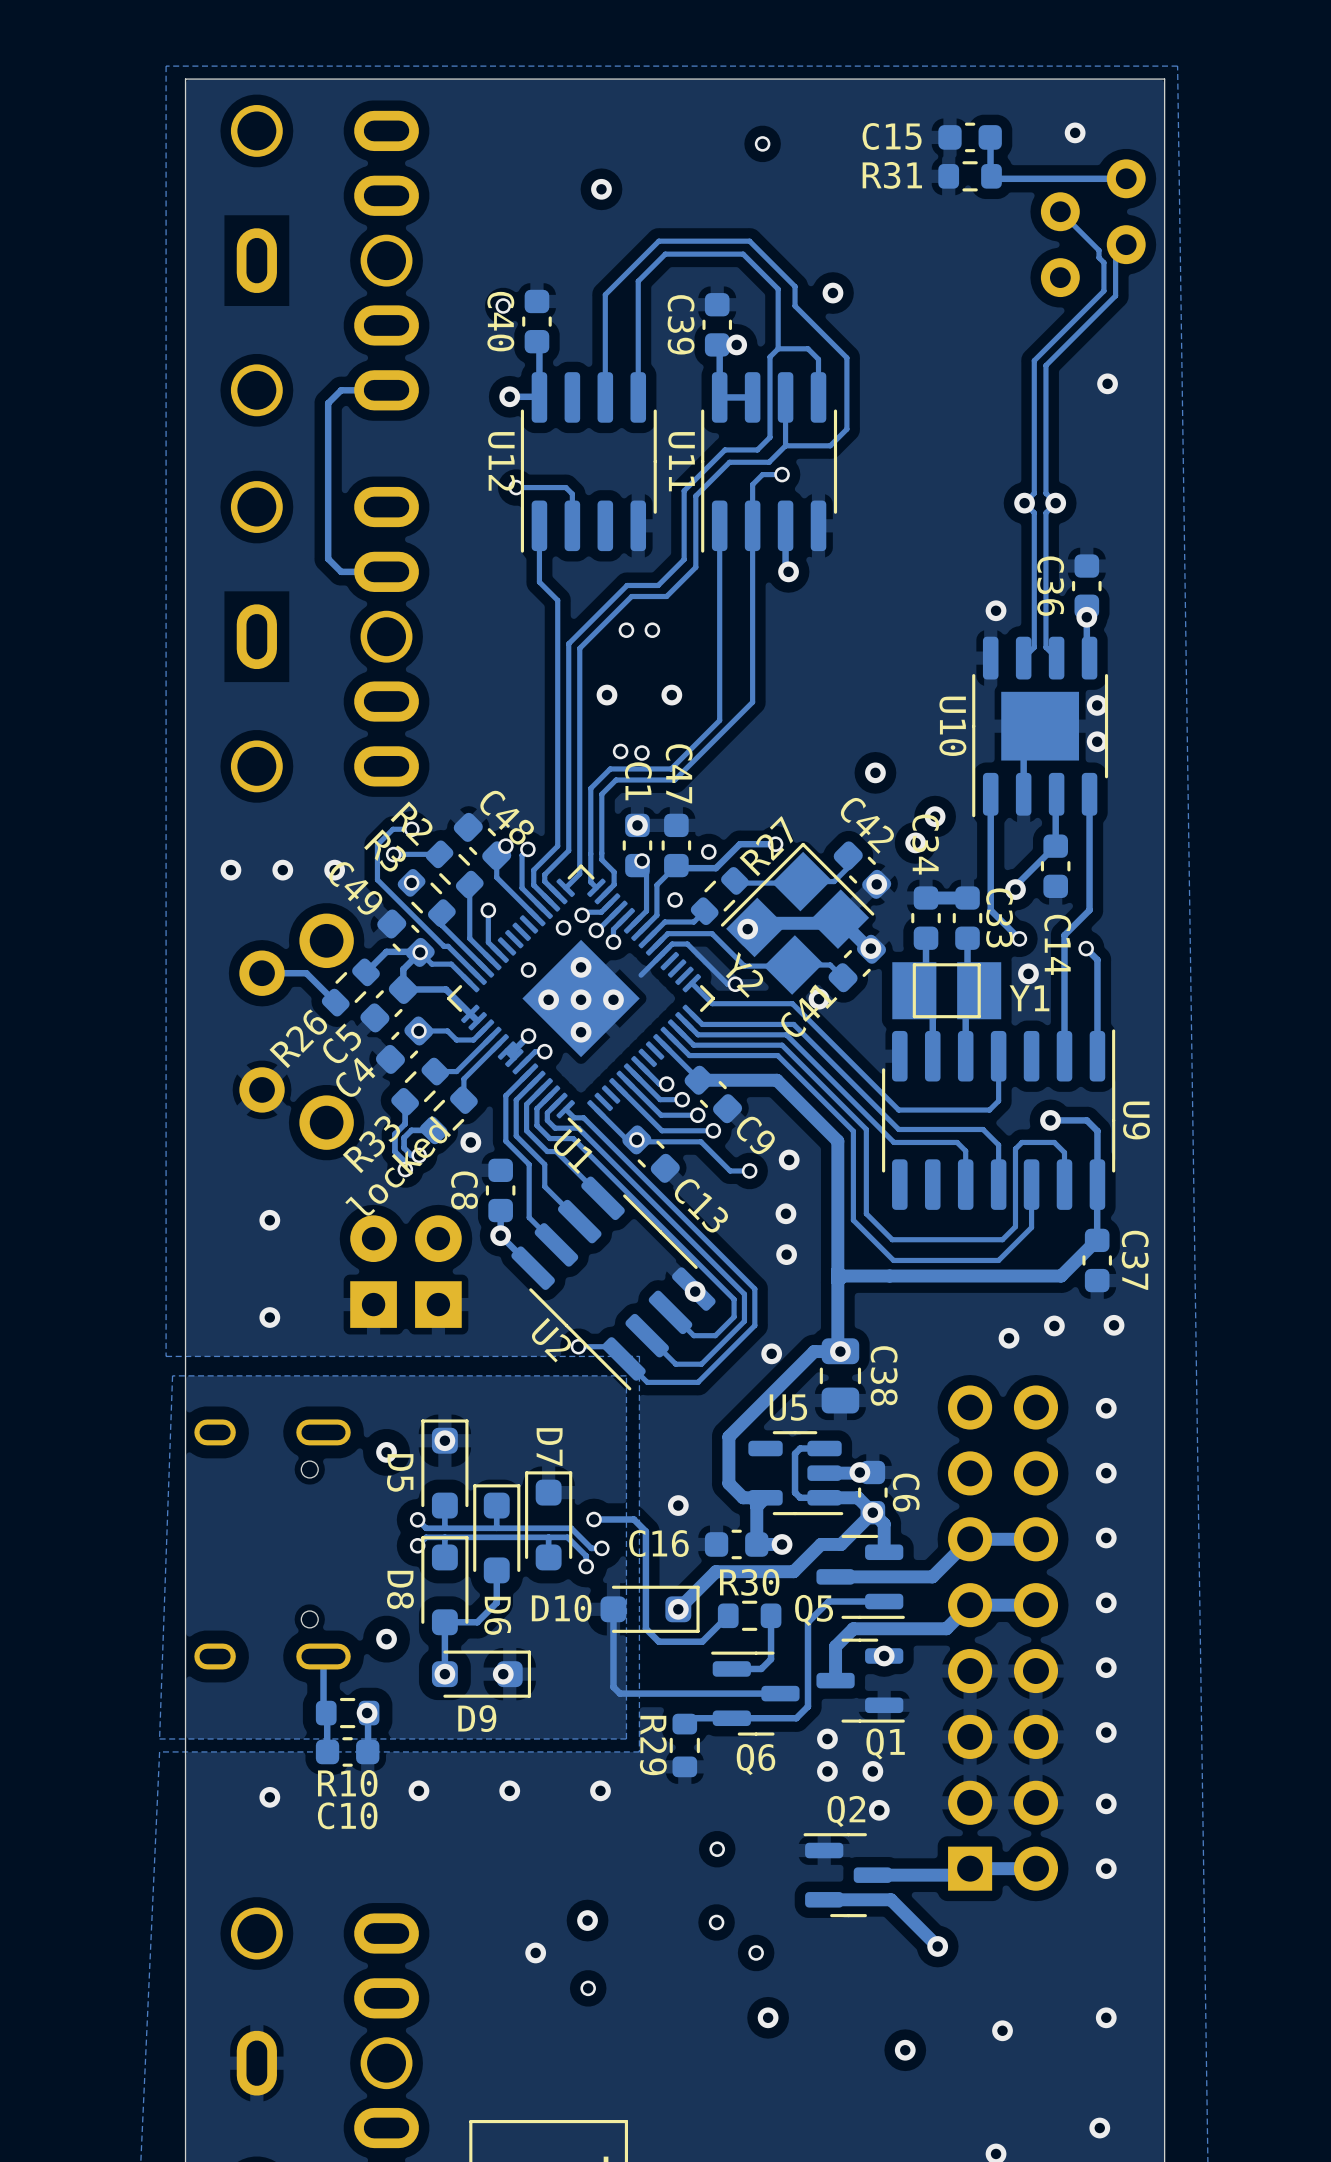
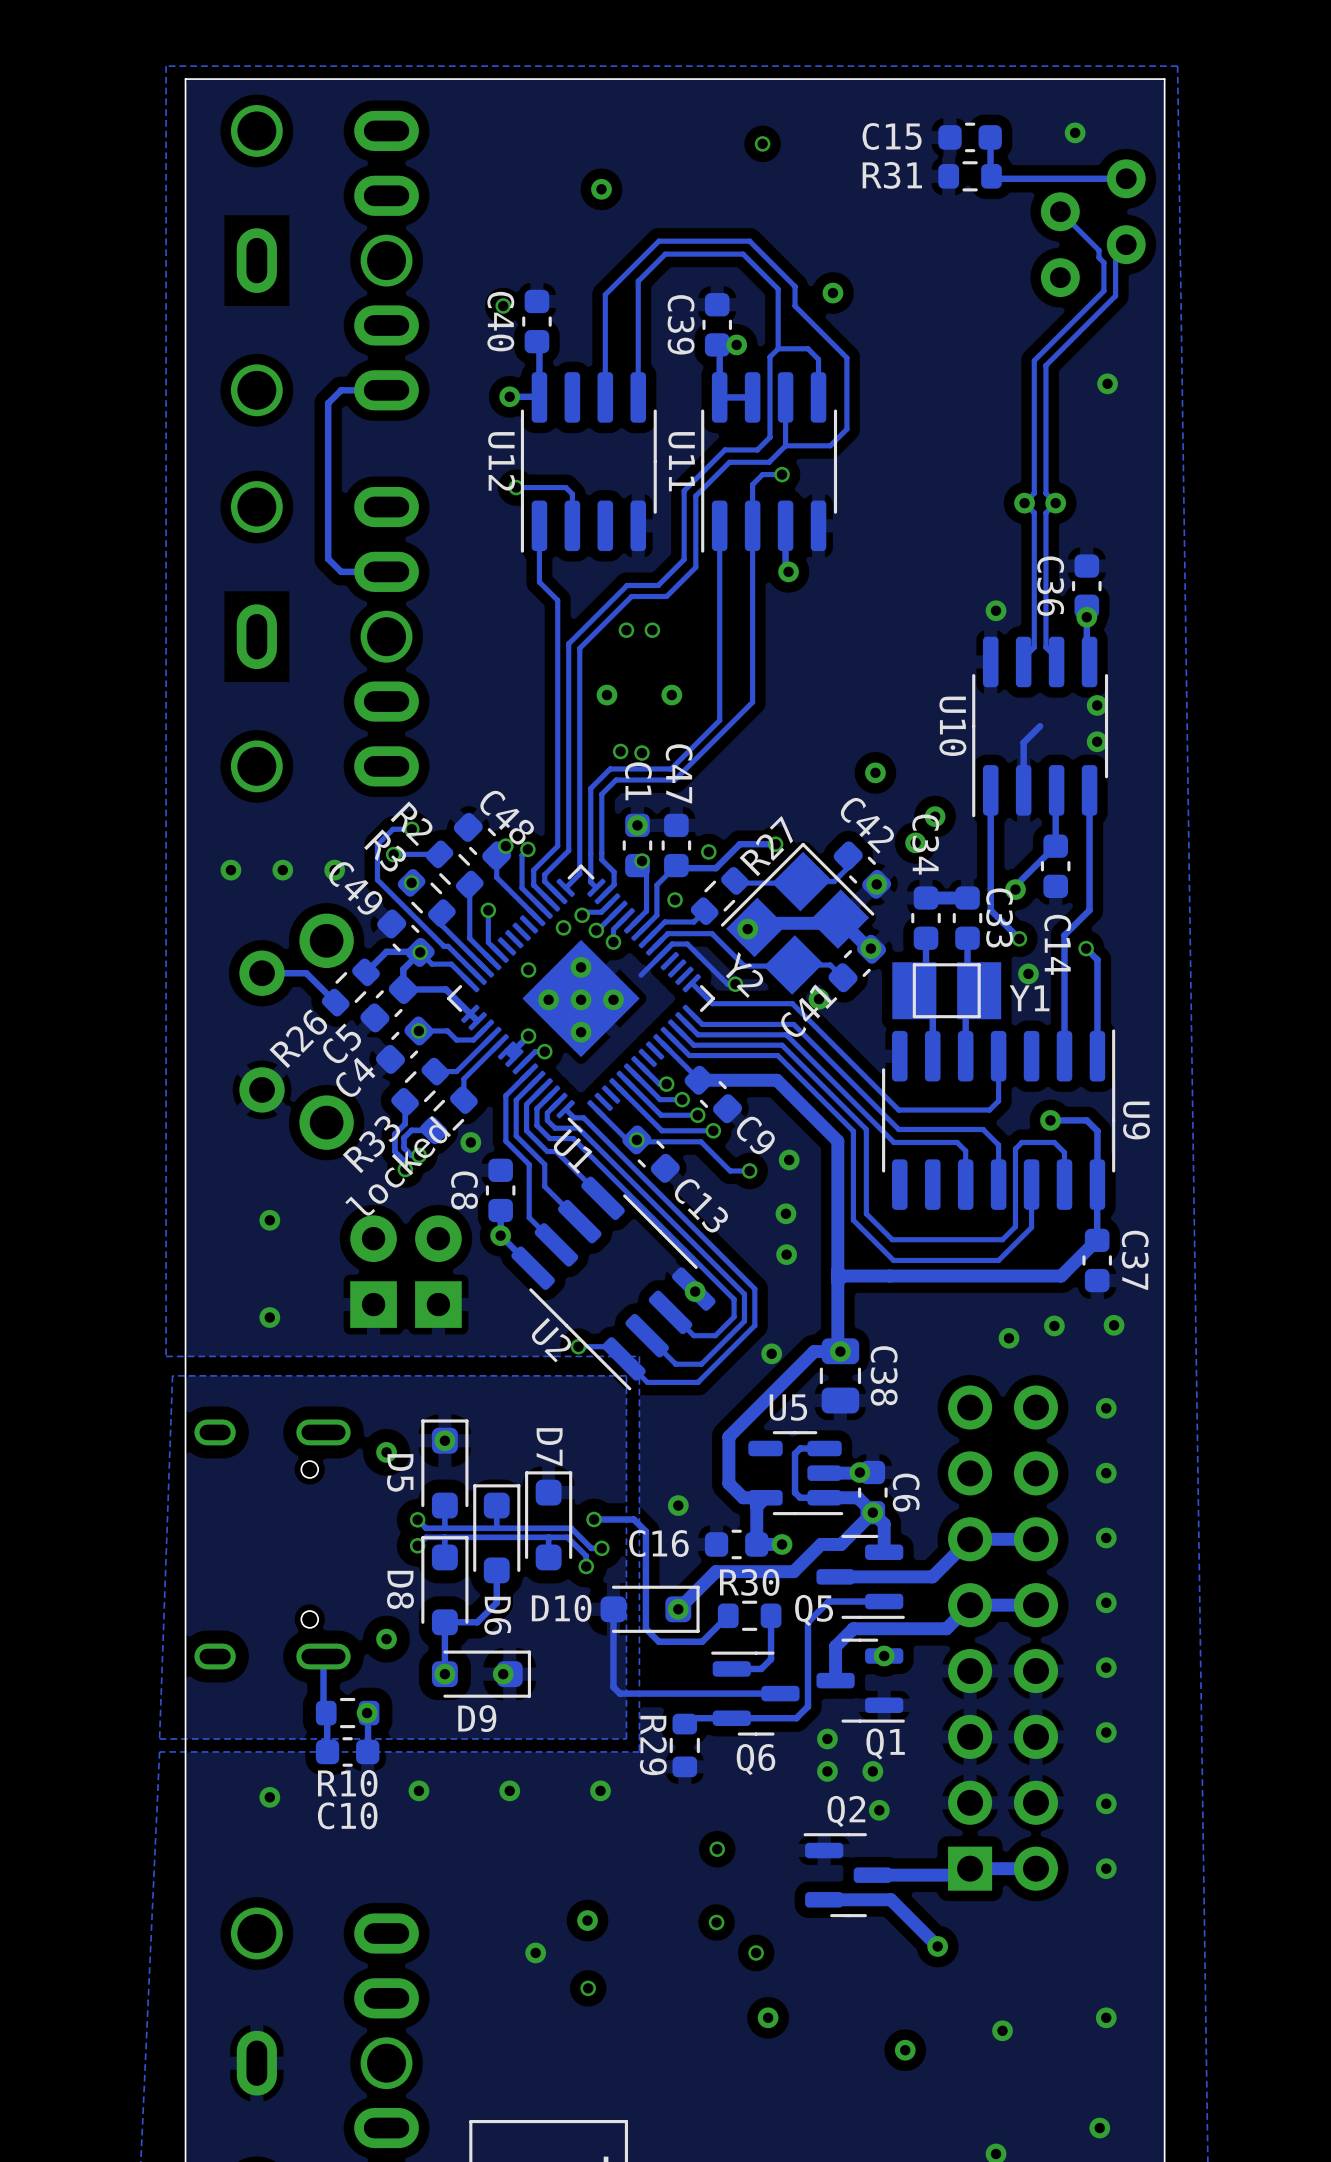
U10 footprint: [972, 636, 1109, 818] -> [972, 636, 1109, 818]

